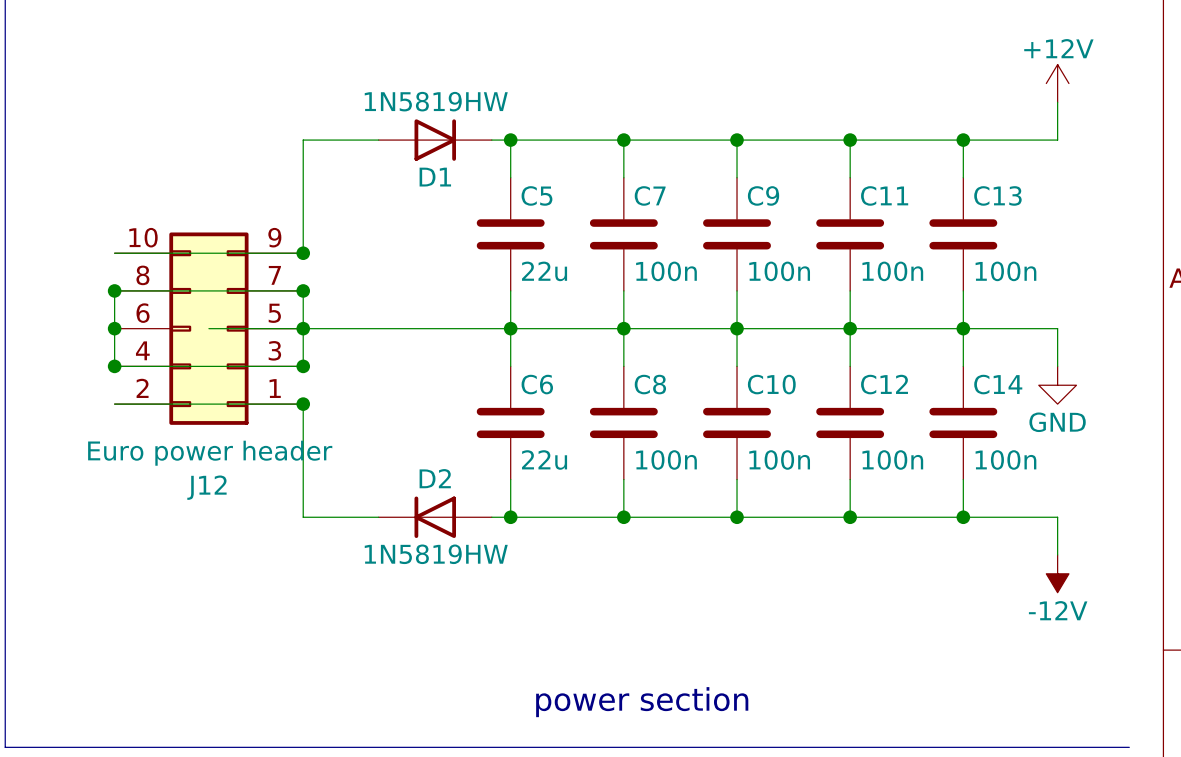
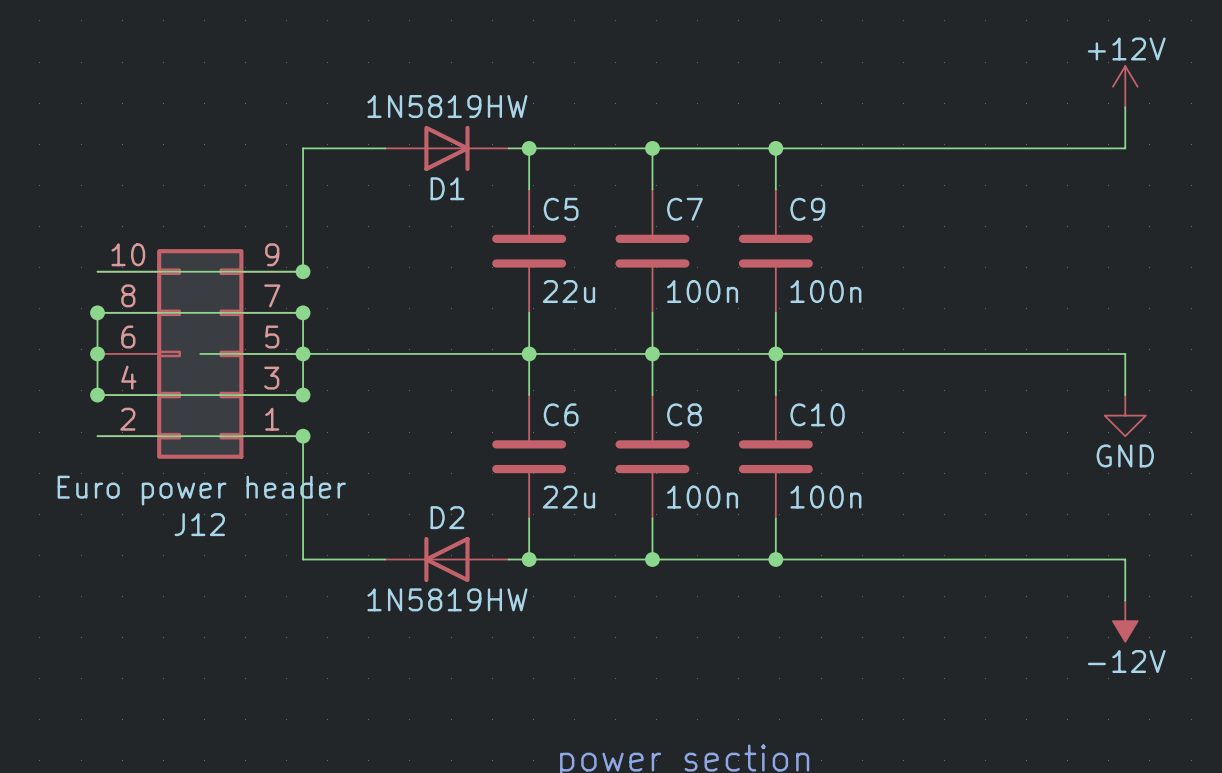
wire: (850, 140) (850, 177) -> none
junction: (850, 140) -> none
wire: (963, 140) (963, 177) -> none
junction: (963, 140) -> none
C11: 100n (850, 234) -> none
C13: 100n (963, 234) -> none
wire: (850, 290) (850, 366) -> none
wire: (963, 290) (963, 366) -> none
junction: (850, 328) -> none
junction: (963, 328) -> none
C12: 100n (850, 422) -> none
C14: 100n (963, 422) -> none
wire: (850, 479) (850, 517) -> none
wire: (963, 479) (963, 517) -> none
junction: (850, 517) -> none
junction: (963, 517) -> none

